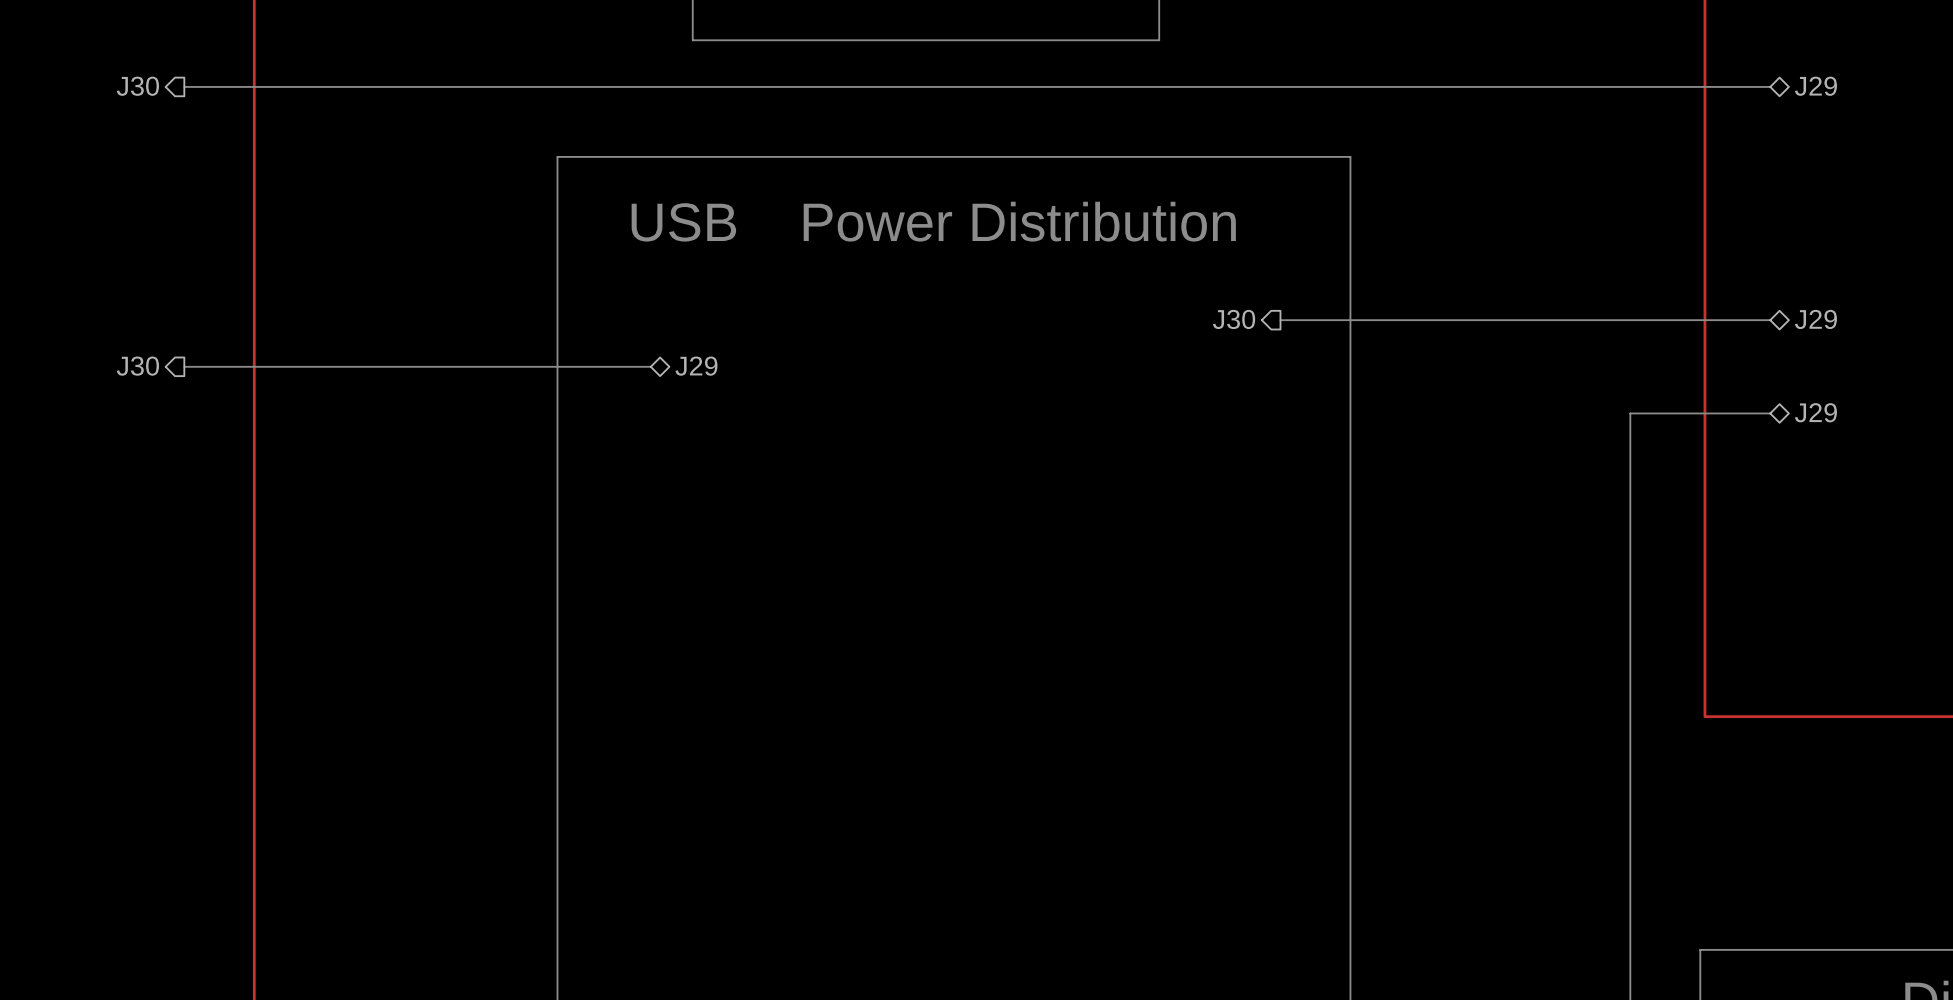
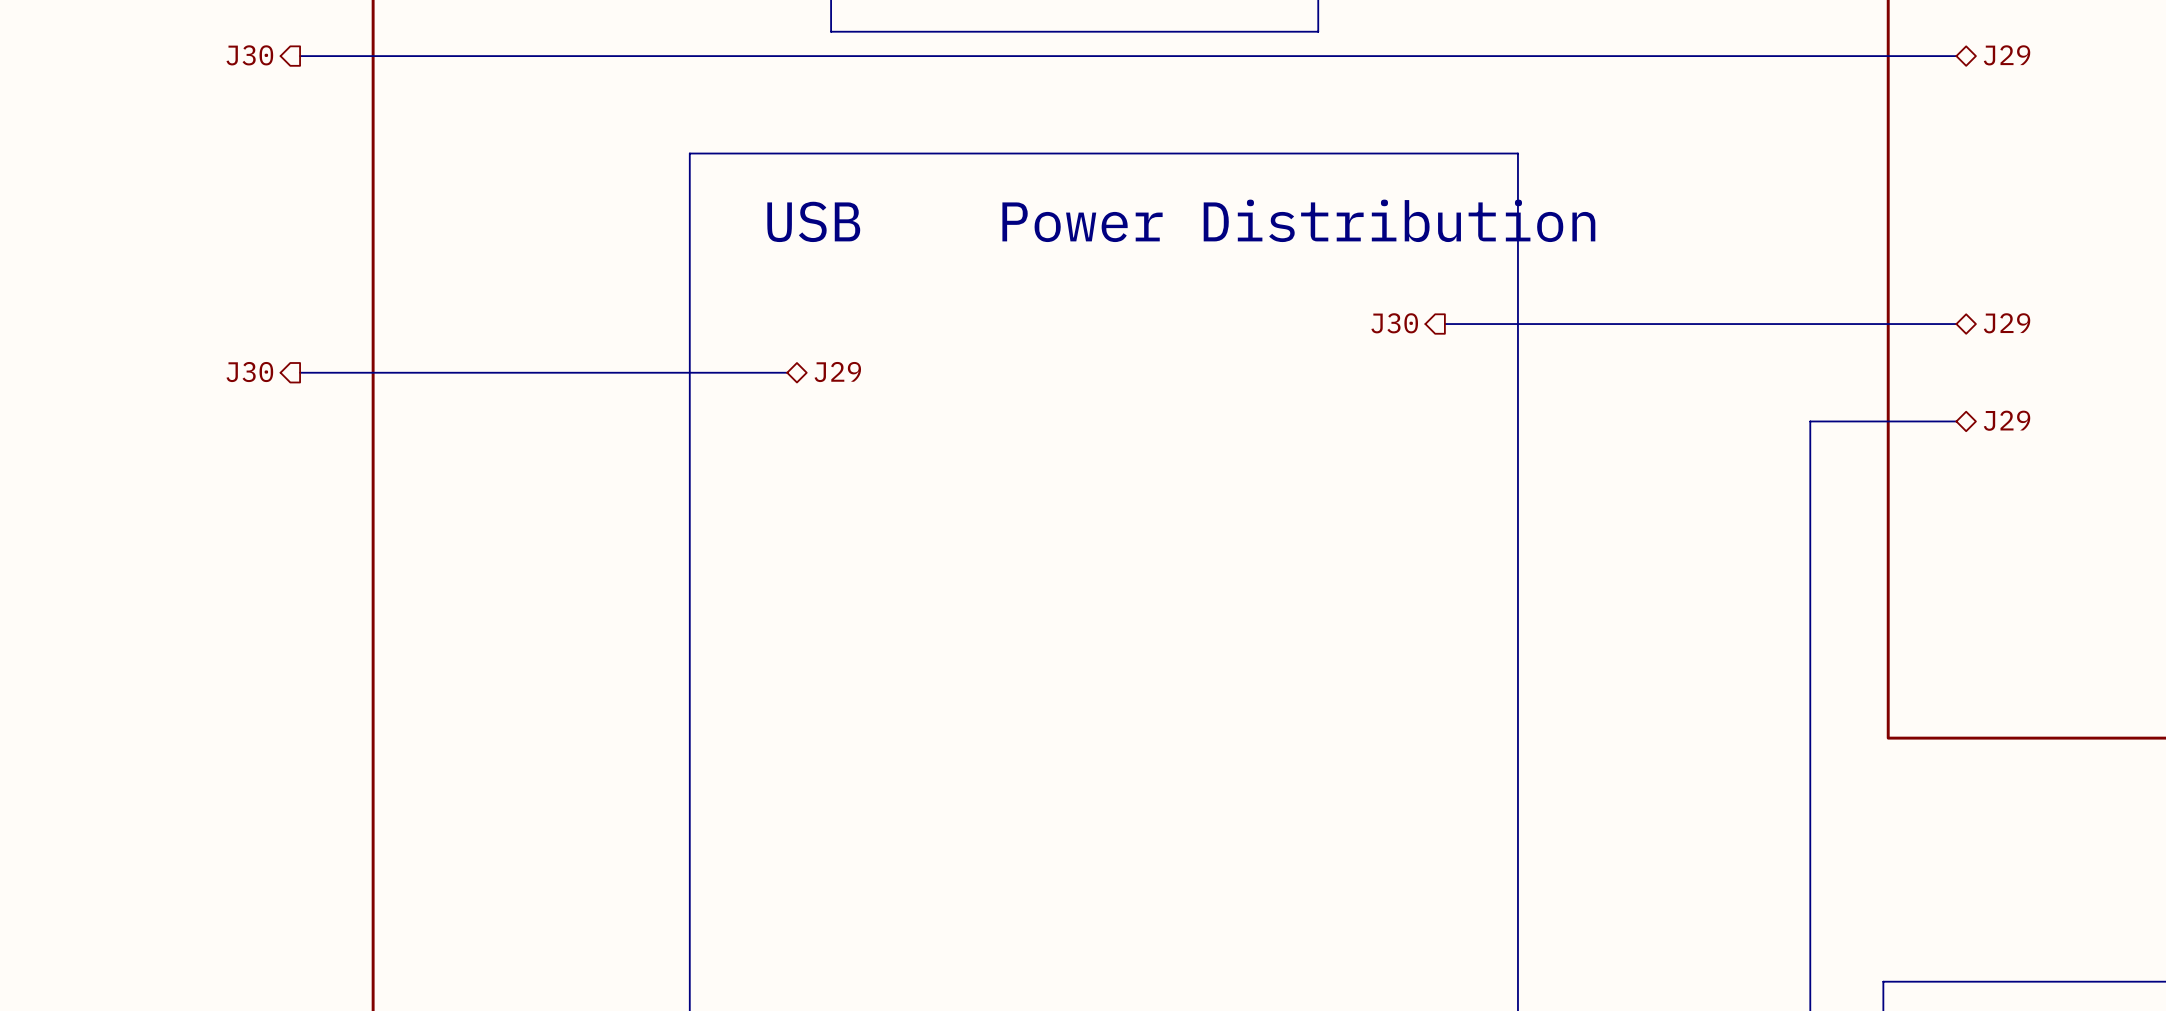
hierarchical label position: J30 (137, 86) -> J30 (249, 55)
bus: (184, 86) (1770, 86) -> (300, 56) (1956, 56)
hierarchical label position: J29 (1815, 86) -> J29 (2007, 55)

